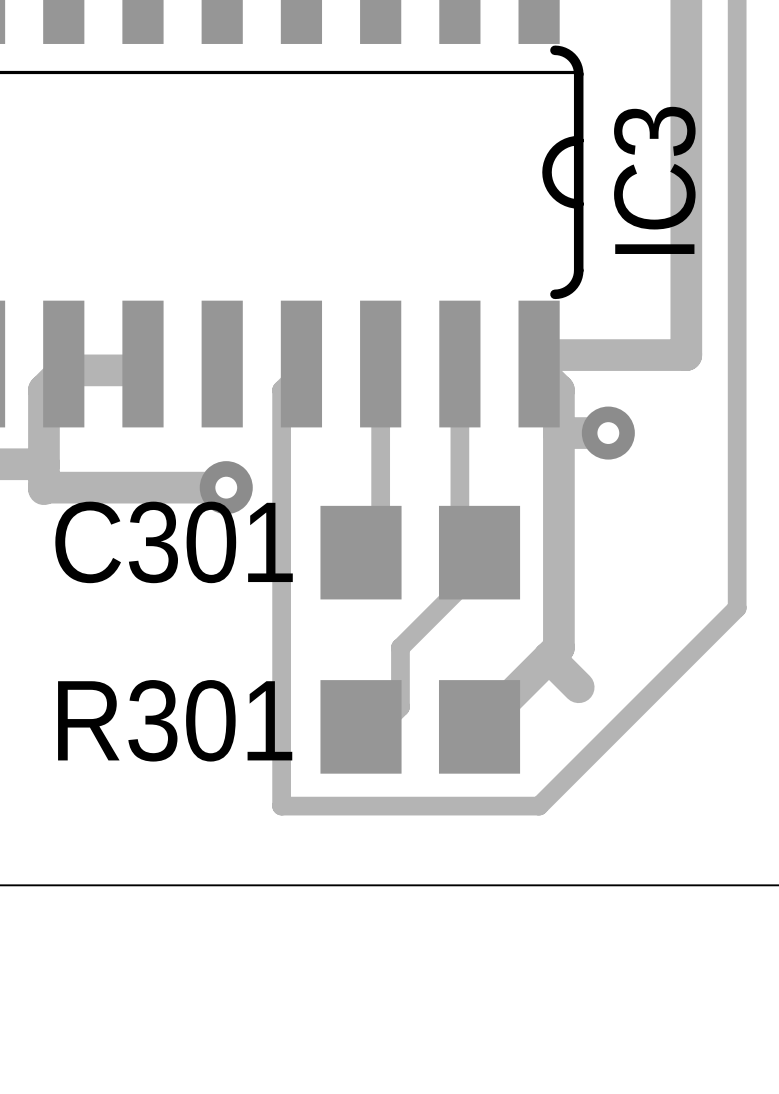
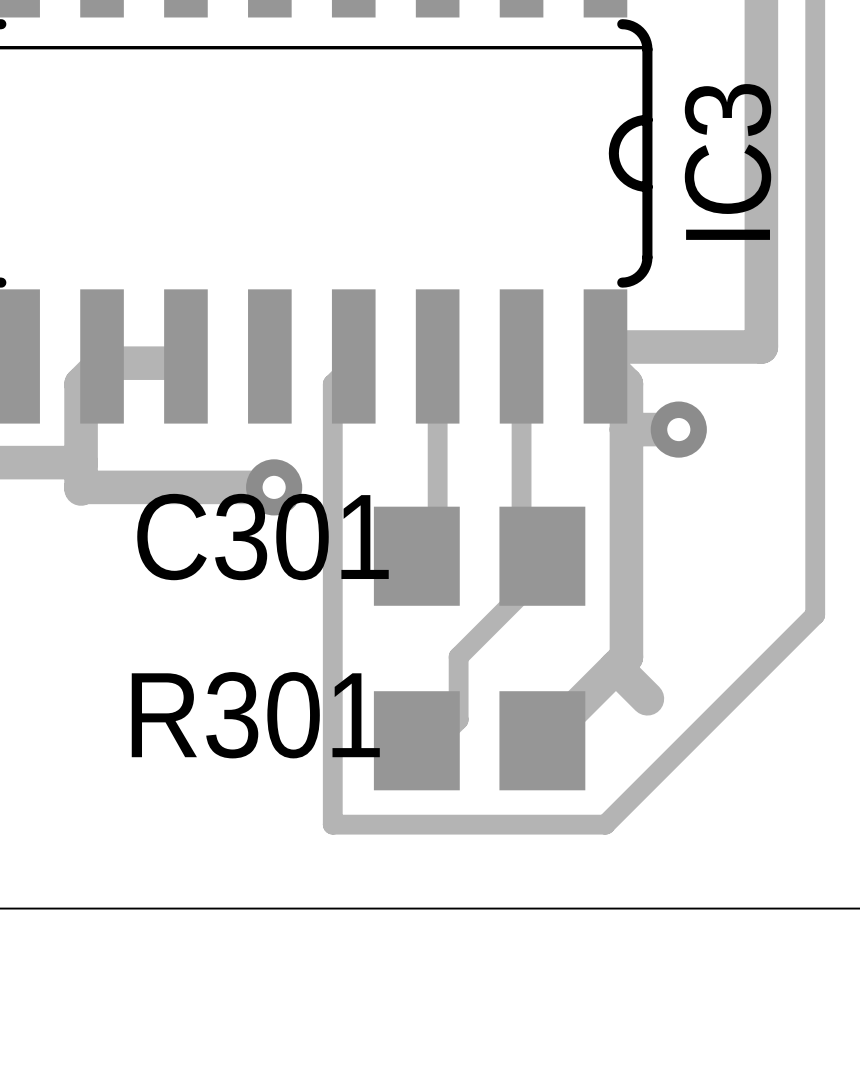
C301 name position: C301 (174, 542) -> C301 (262, 537)
R301 name position: R301 (175, 720) -> R301 (255, 715)

